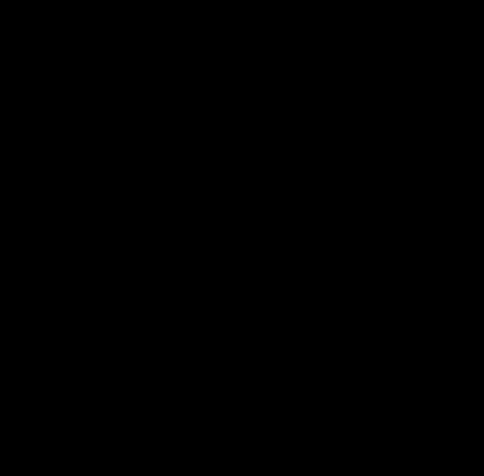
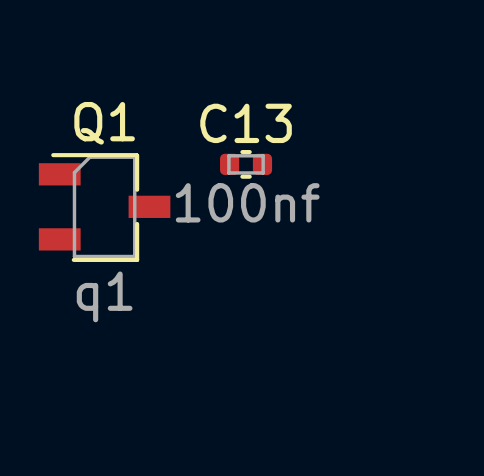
C13: none -> 100nf (246, 164)
Q1: none -> q1 (104, 207)

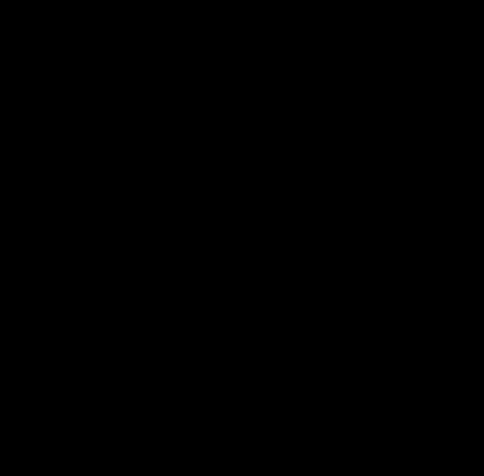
C13: 100nf (246, 164) -> none
Q1: q1 (104, 207) -> none

